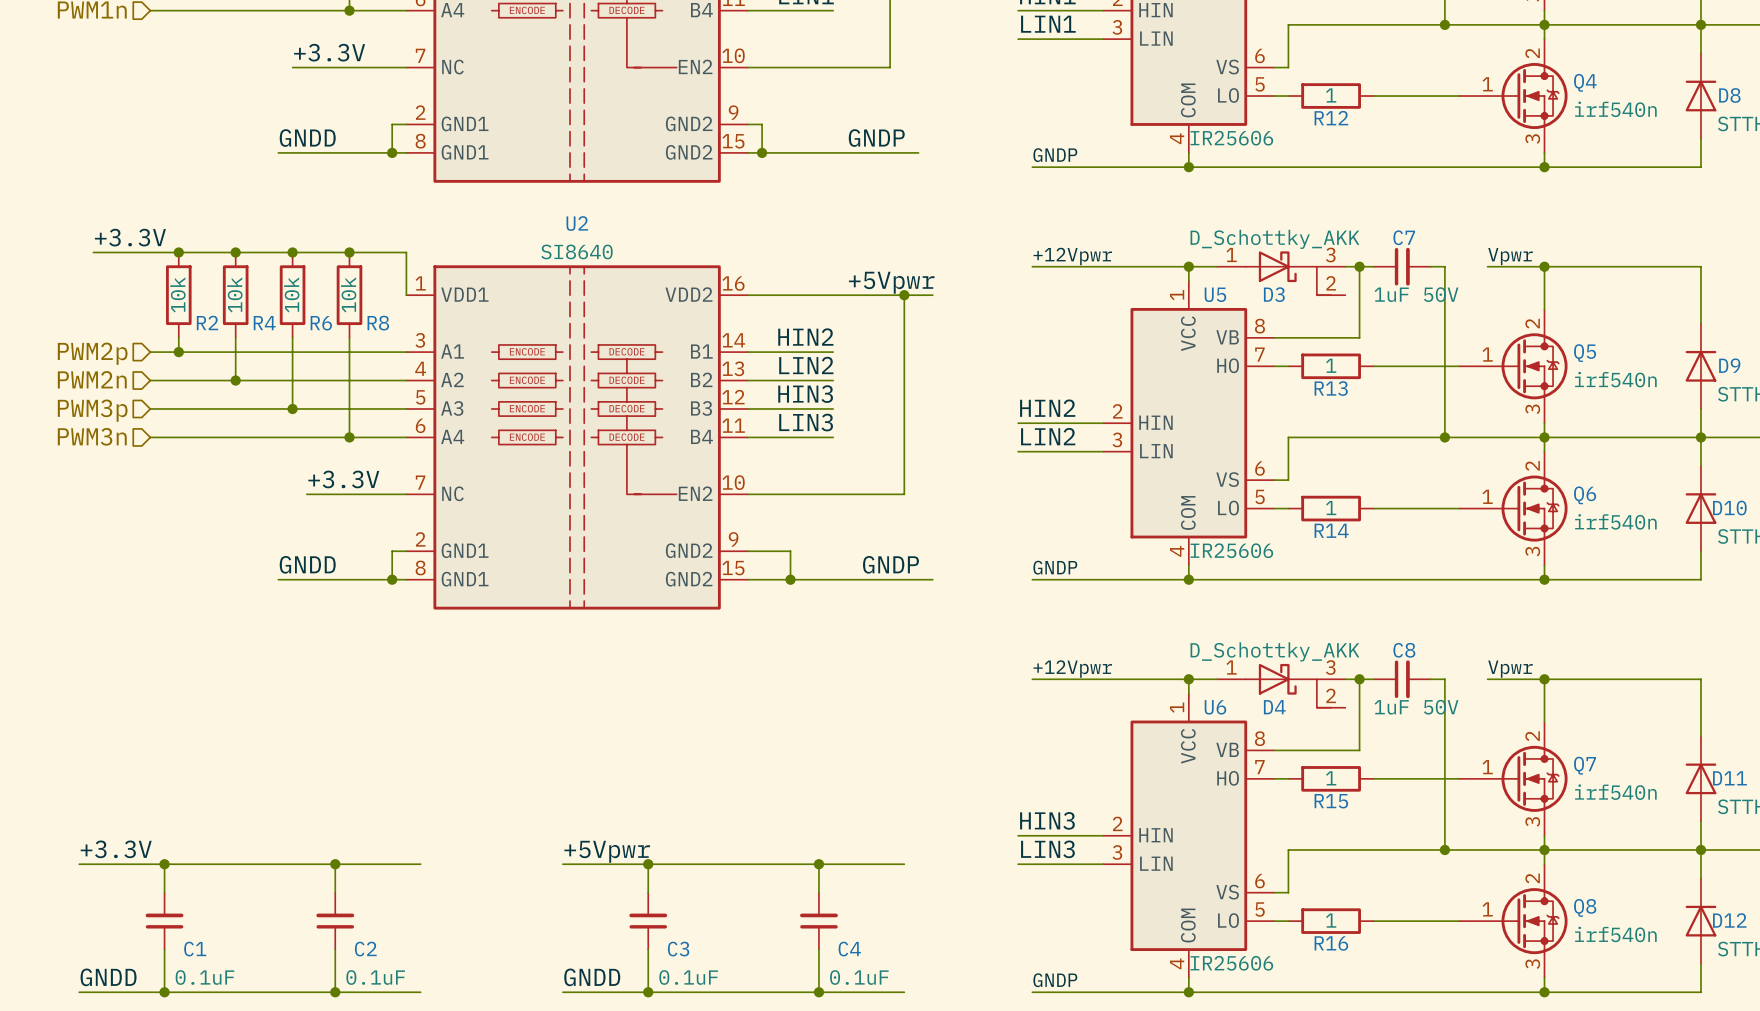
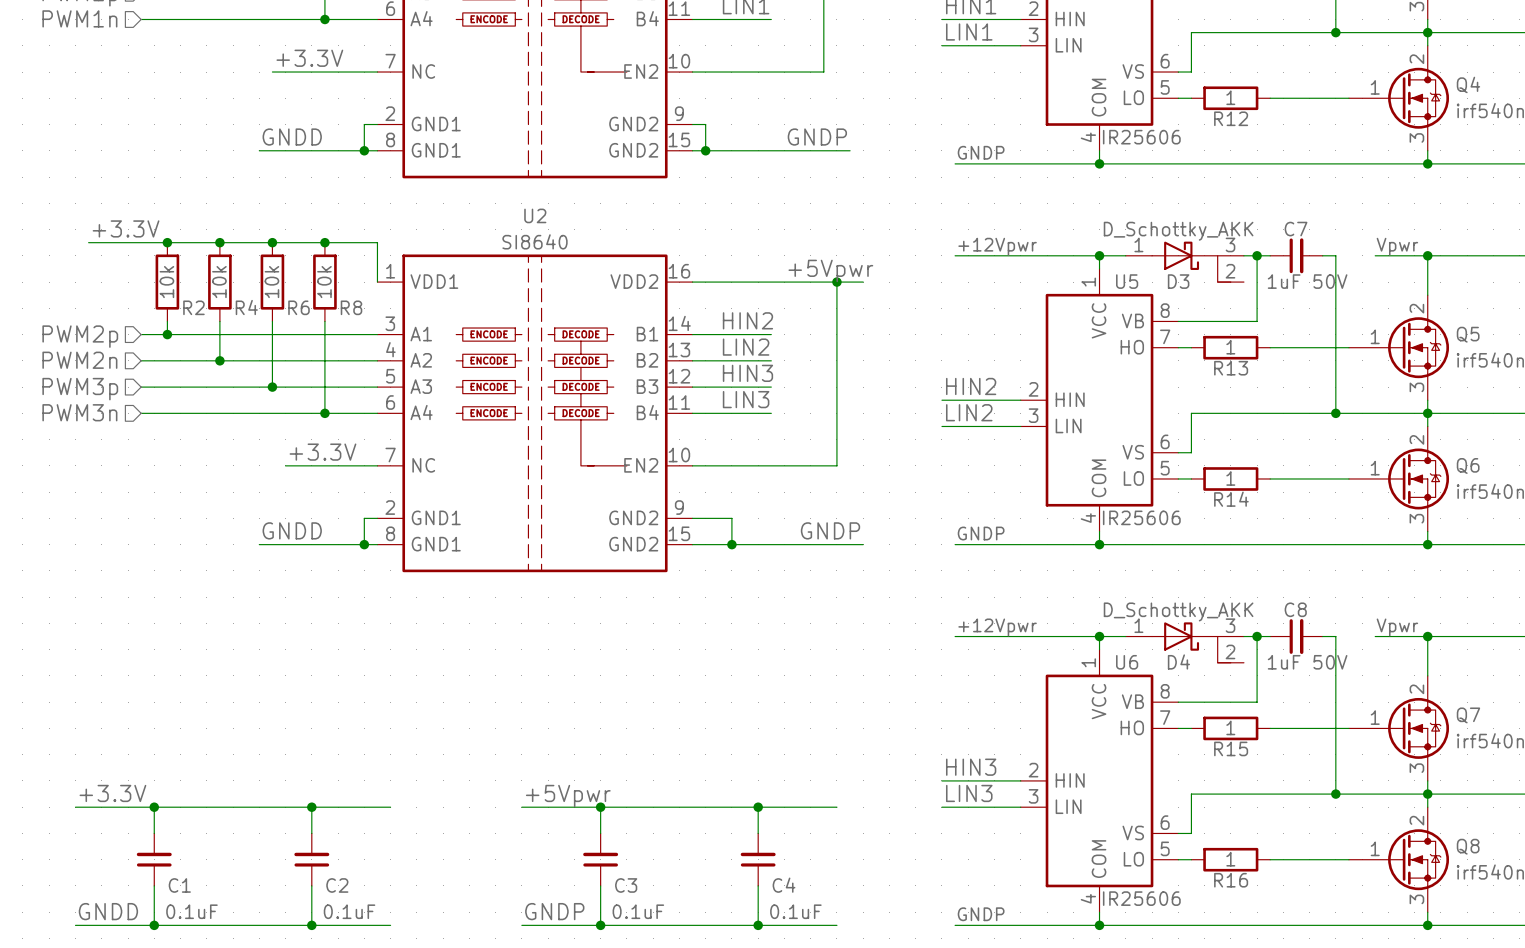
label: GNDD (592, 977) -> GNDP (554, 911)

